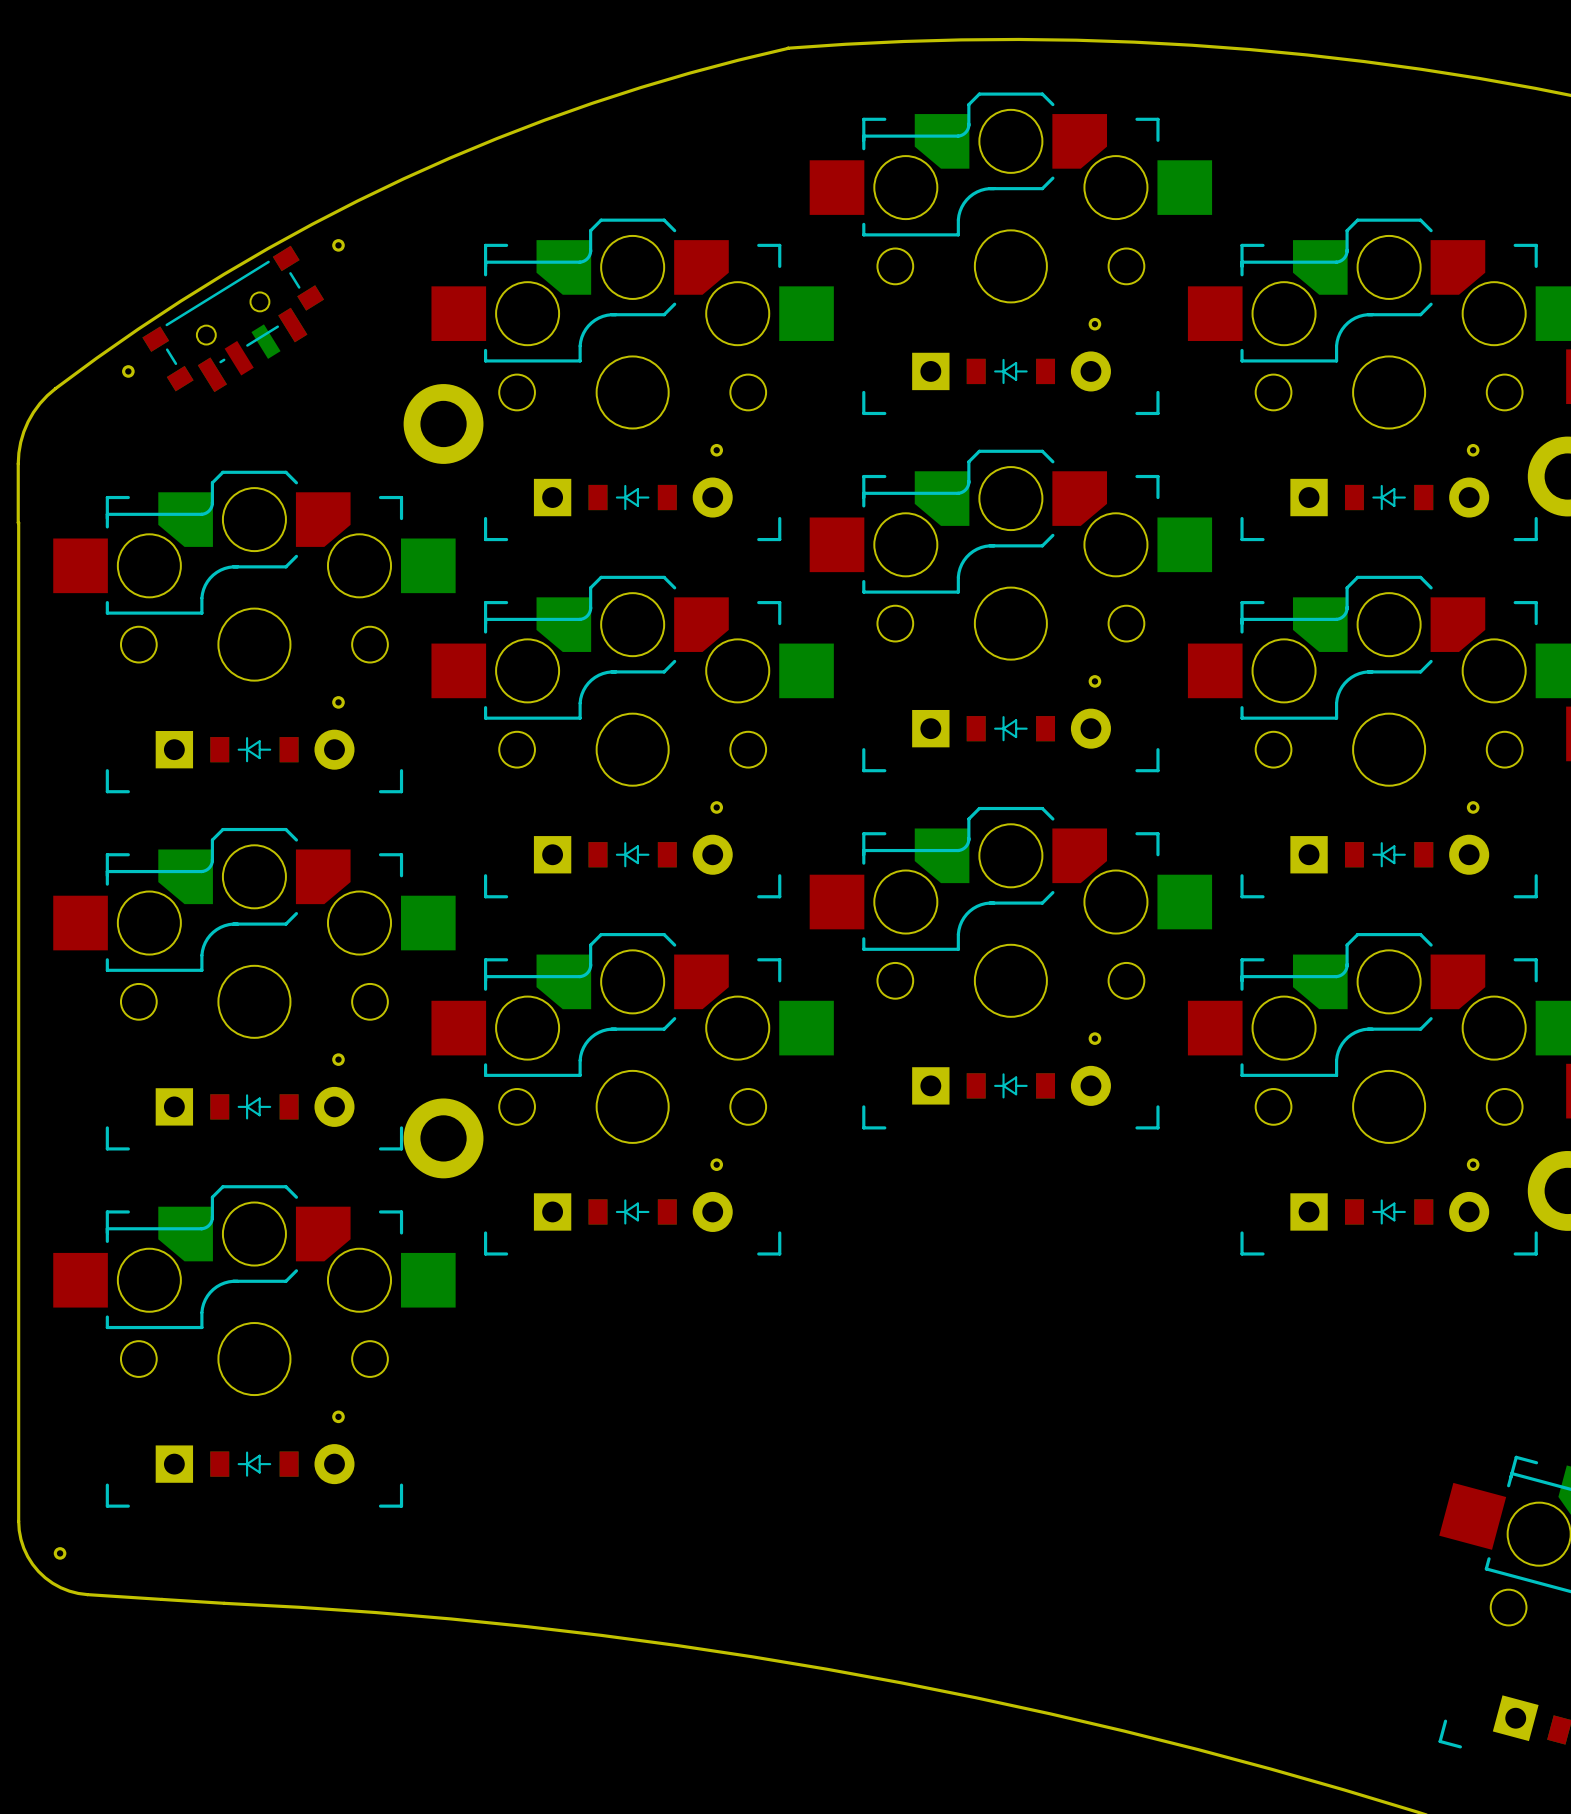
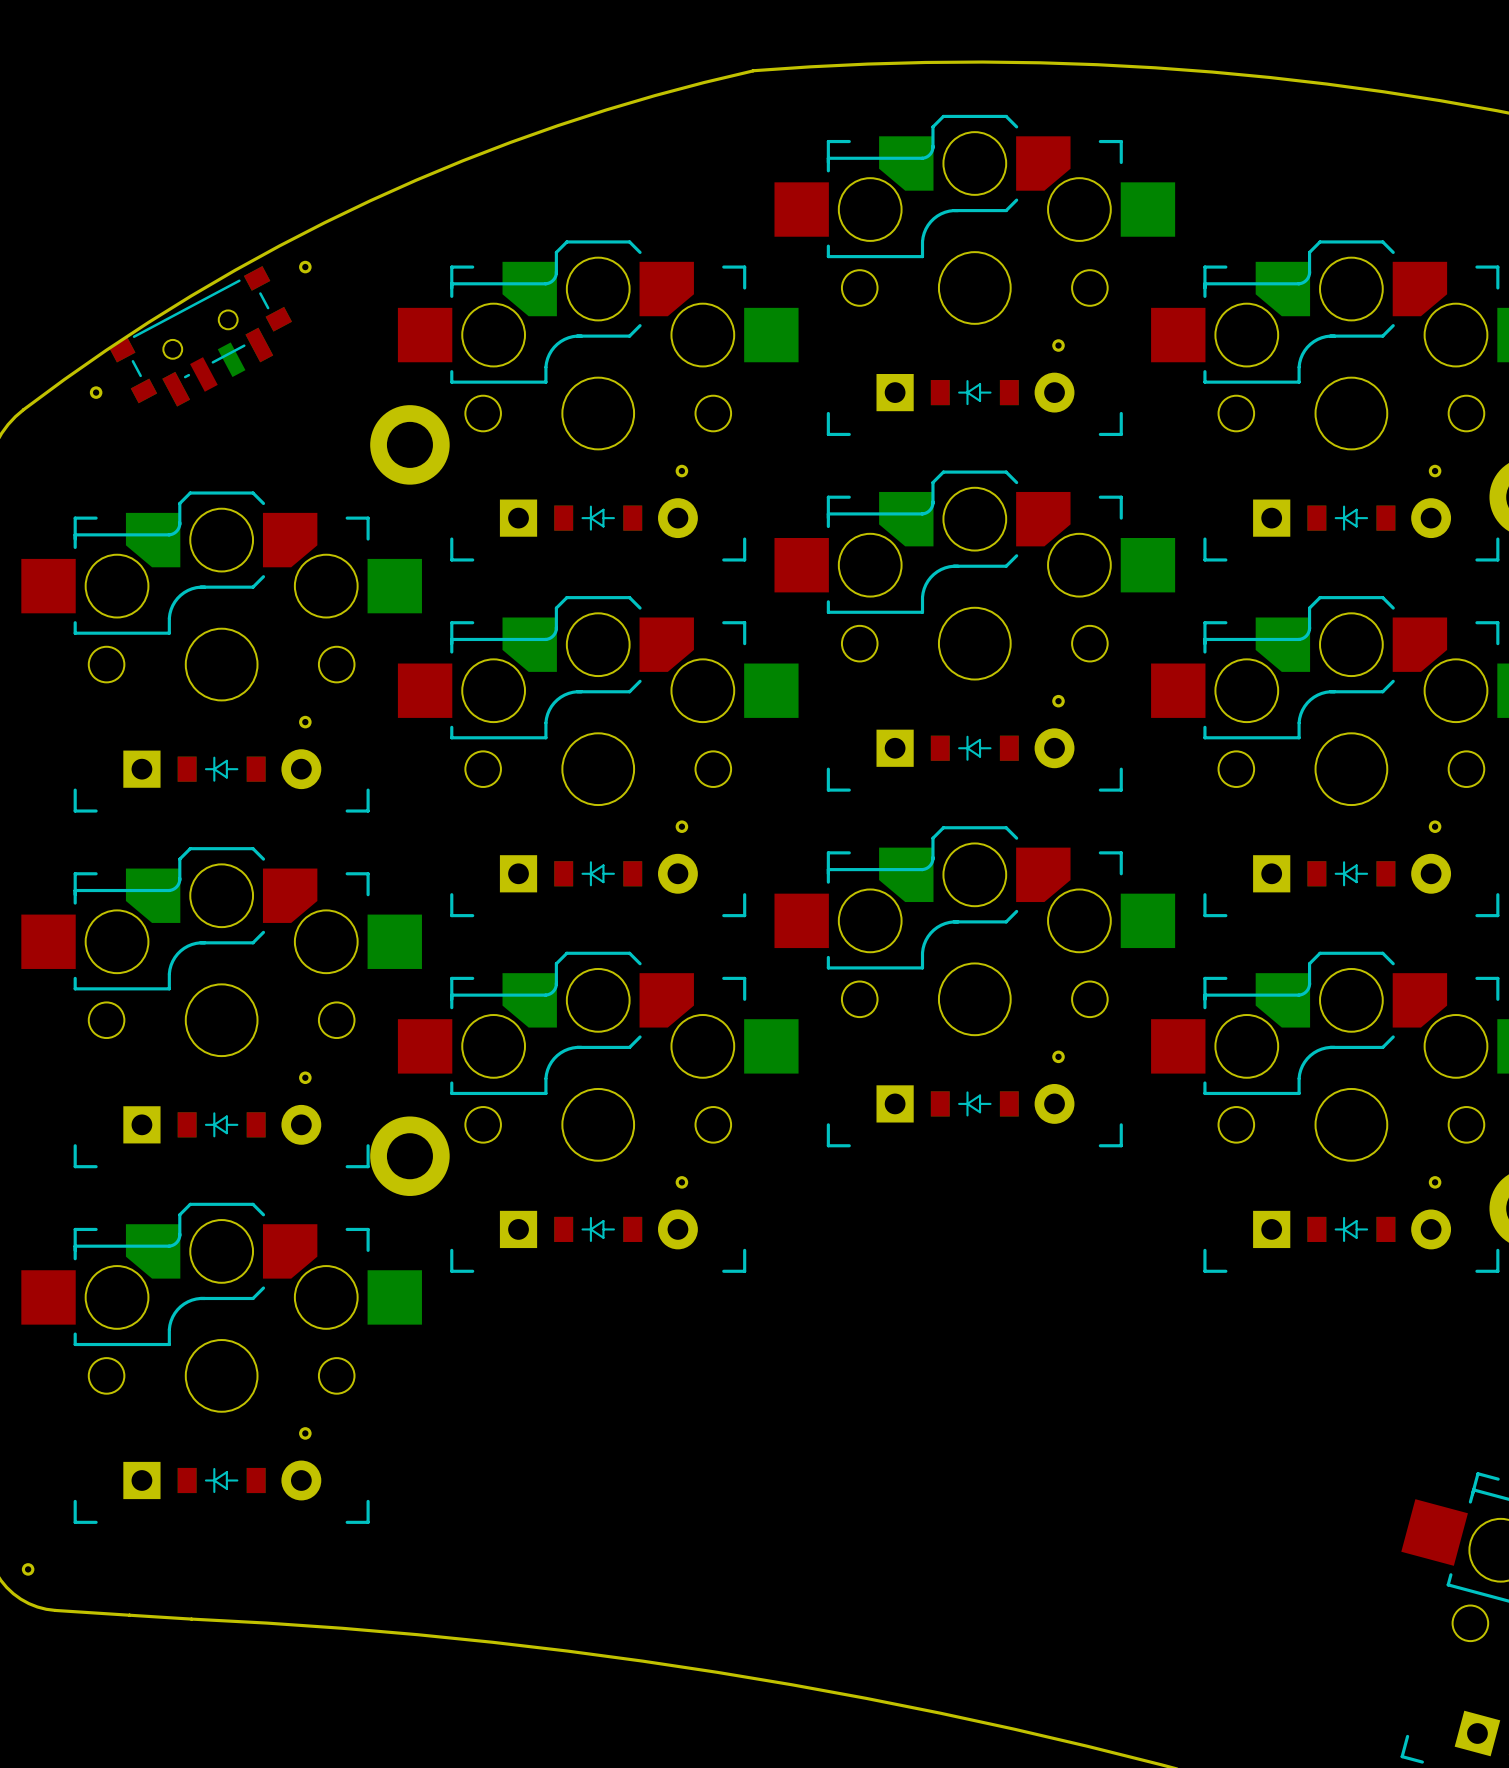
part rotation: 0° (233, 318) -> 3.8° clockwise (200, 336)

